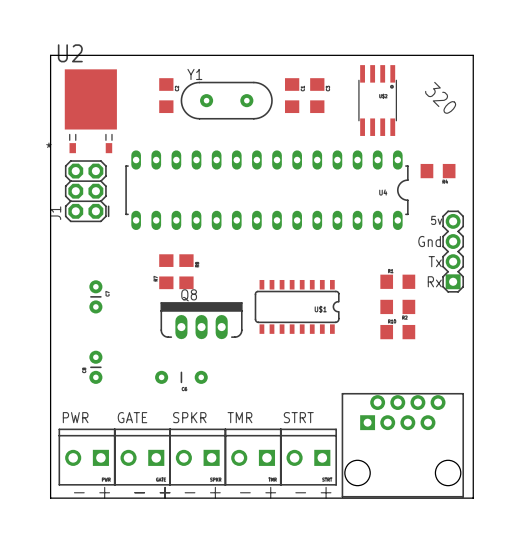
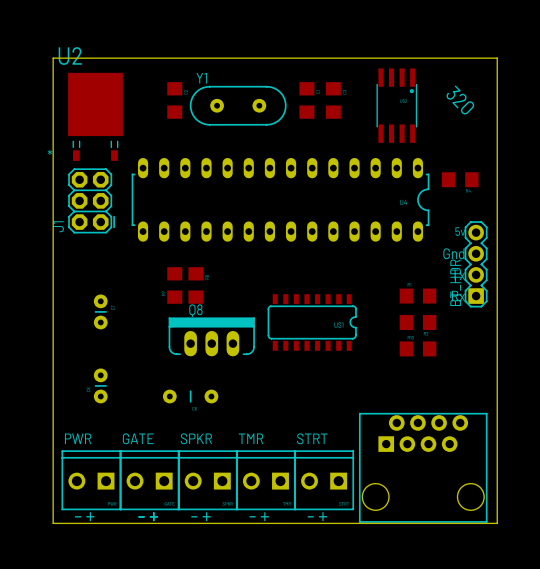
BT_HDR name: none -> BT_HDR (455, 282)

